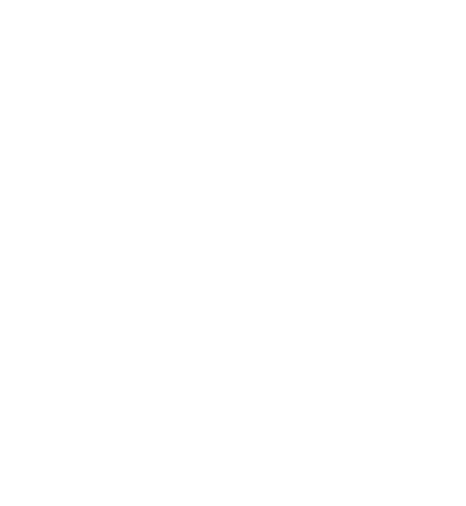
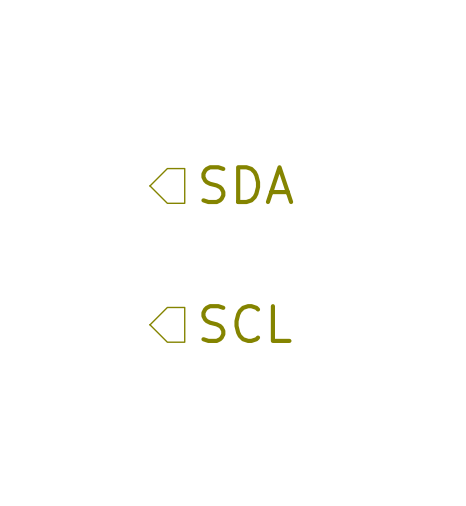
hierarchical label: none -> SDA (247, 184)
hierarchical label: none -> SCL (246, 323)

